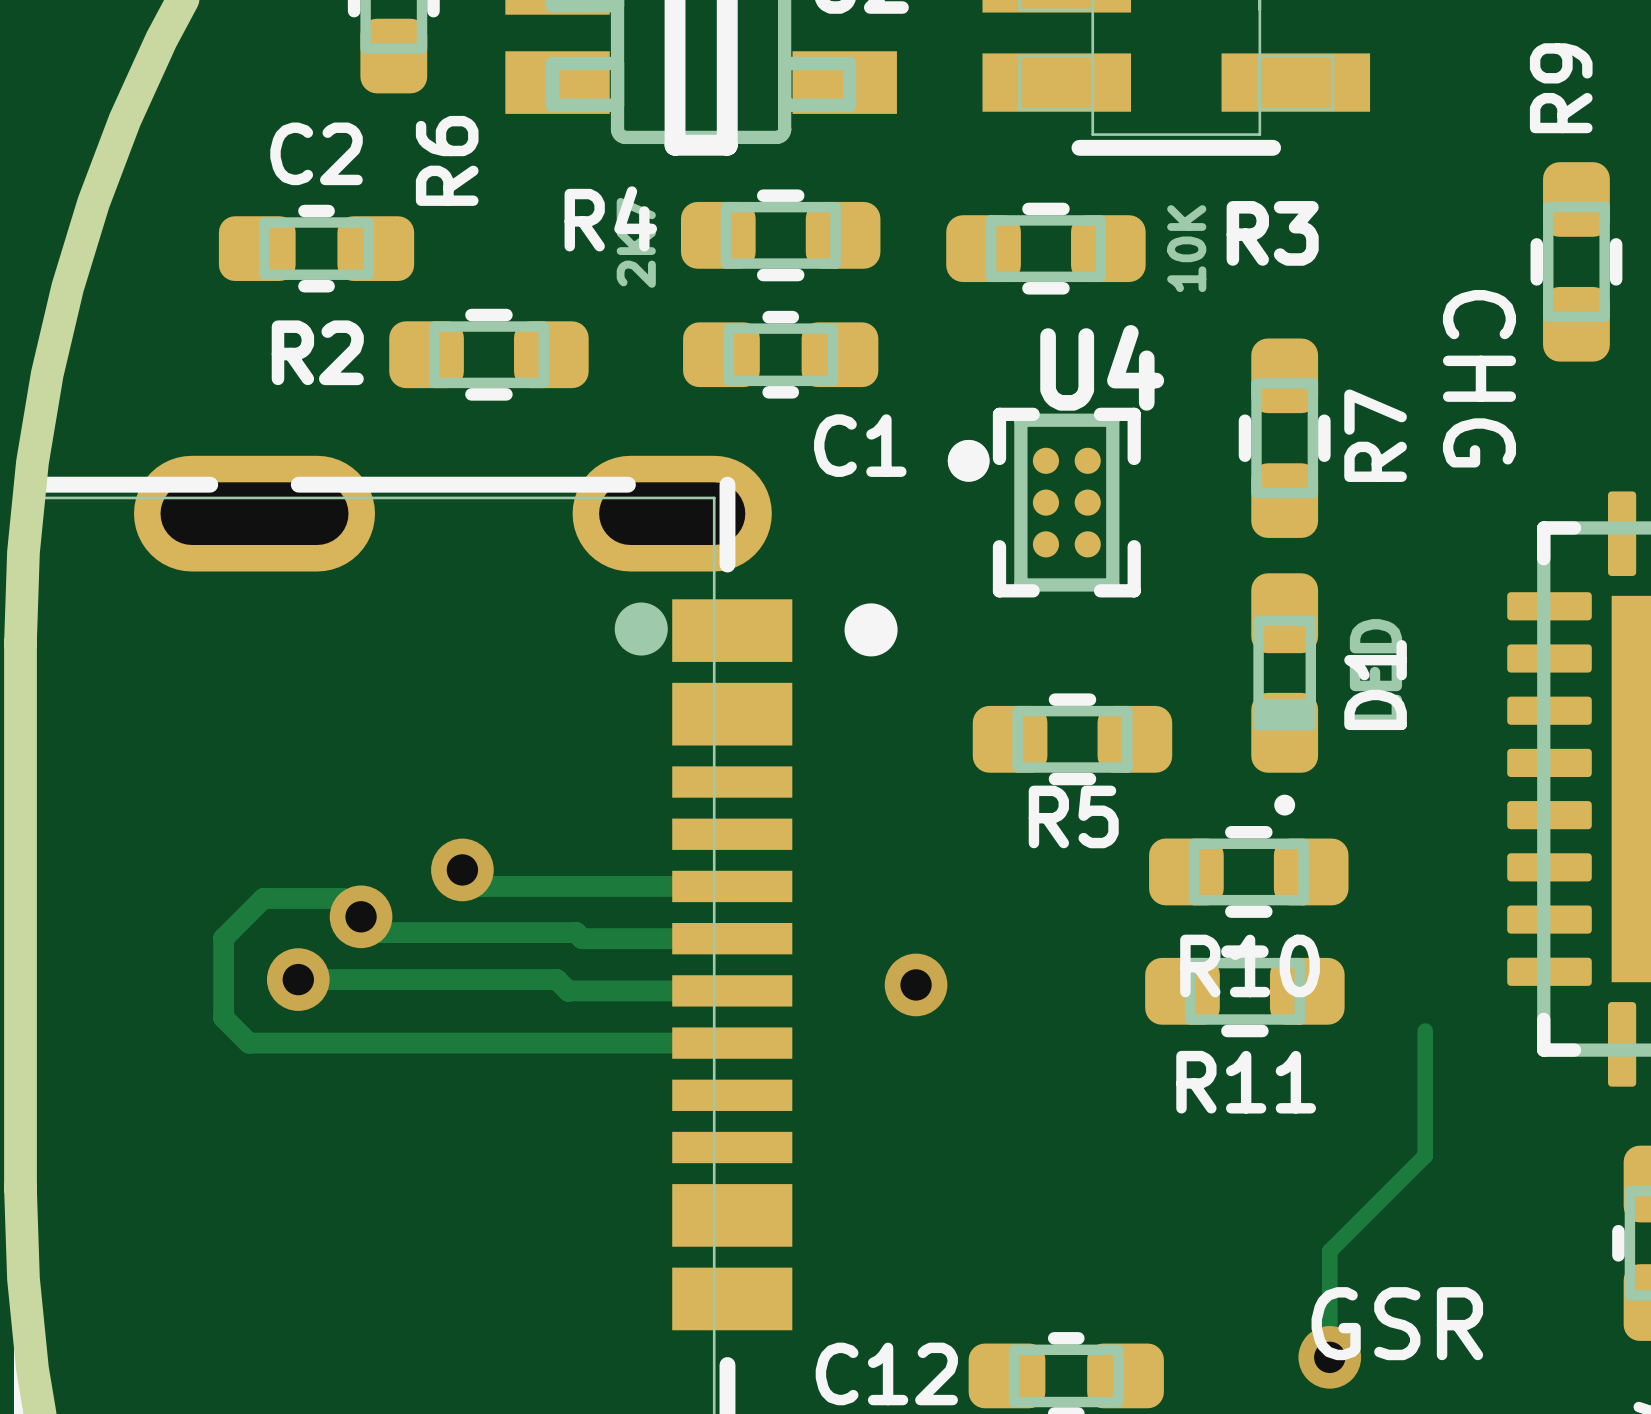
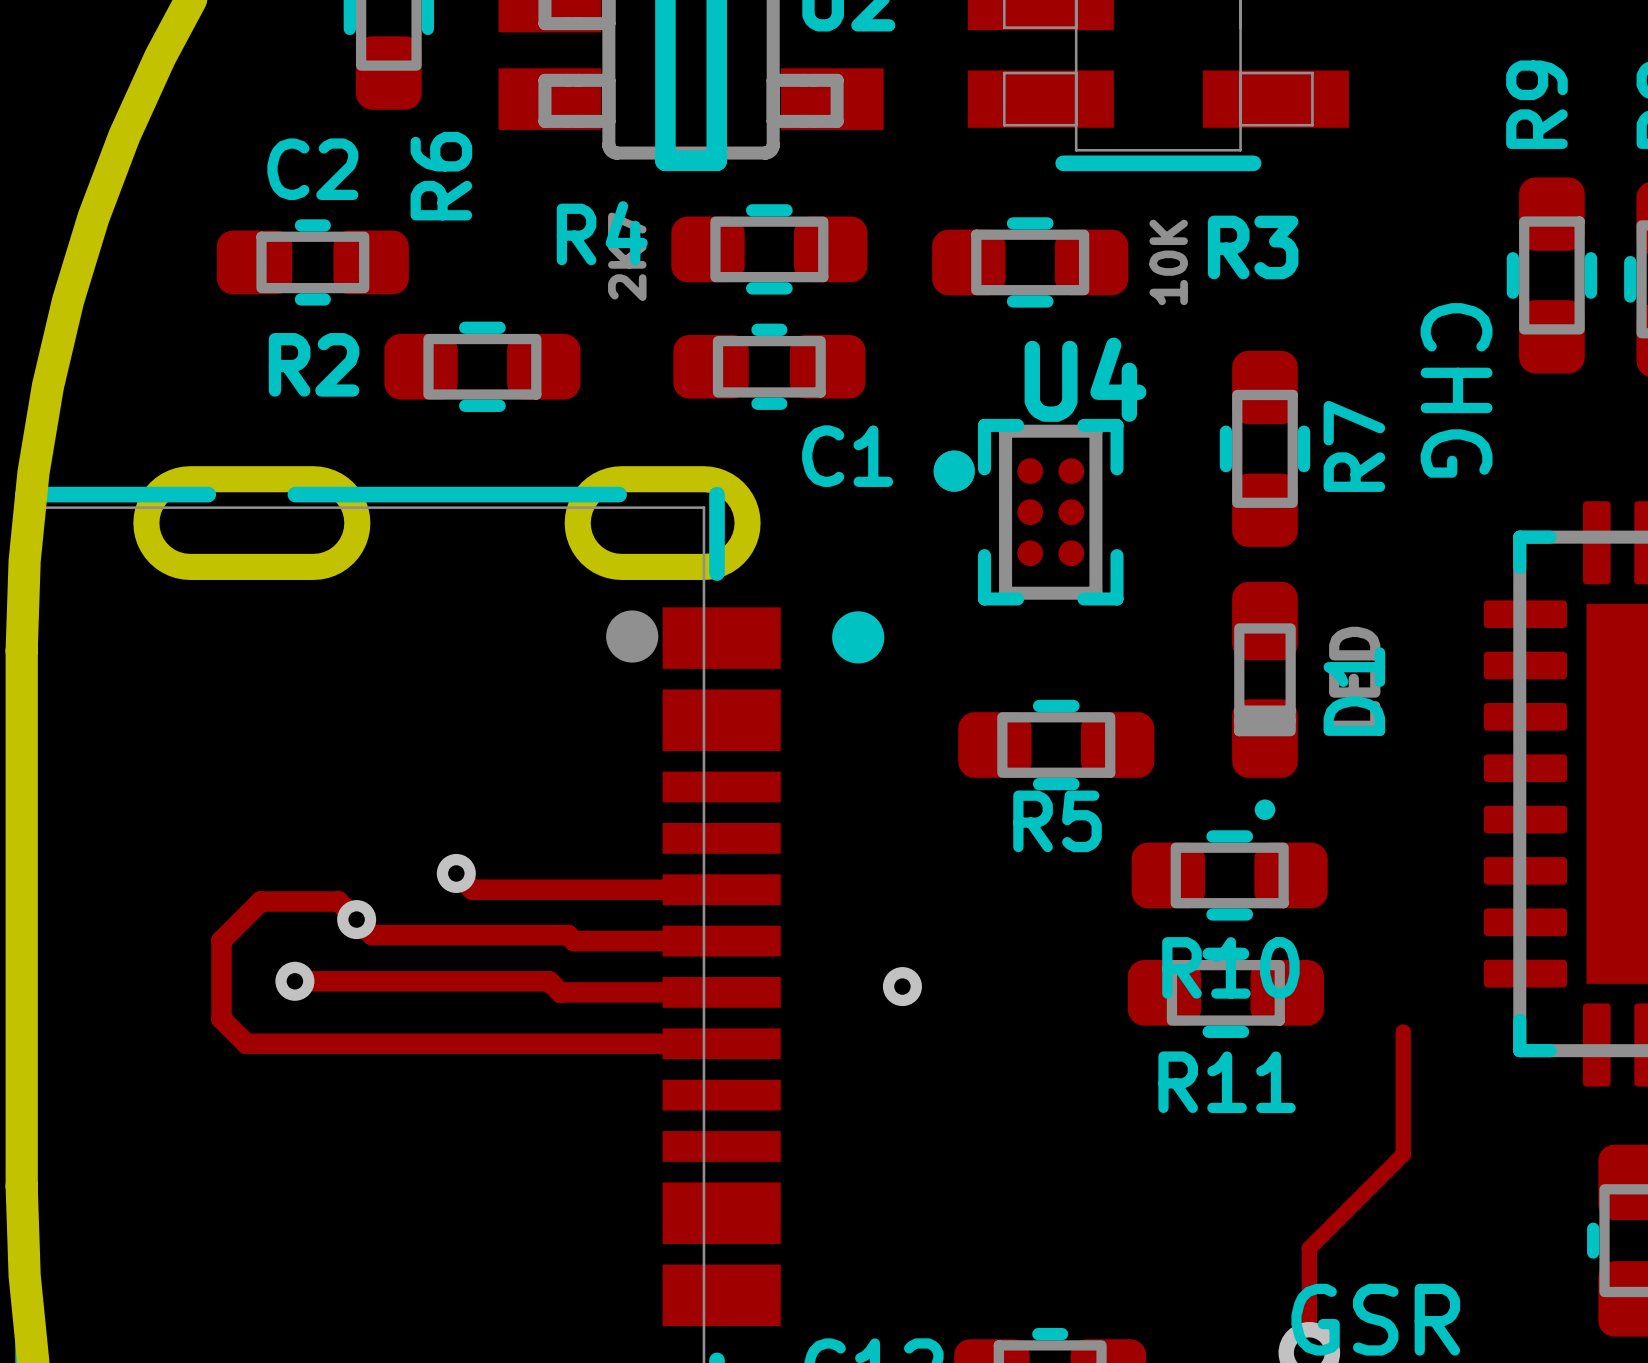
via size: [431, 838, 494, 902] -> [436, 853, 476, 893]
via size: [329, 885, 393, 949] -> [337, 900, 377, 940]
via size: [266, 948, 330, 1011] -> [275, 961, 315, 1001]
via size: [884, 953, 948, 1017] -> [882, 967, 922, 1007]

